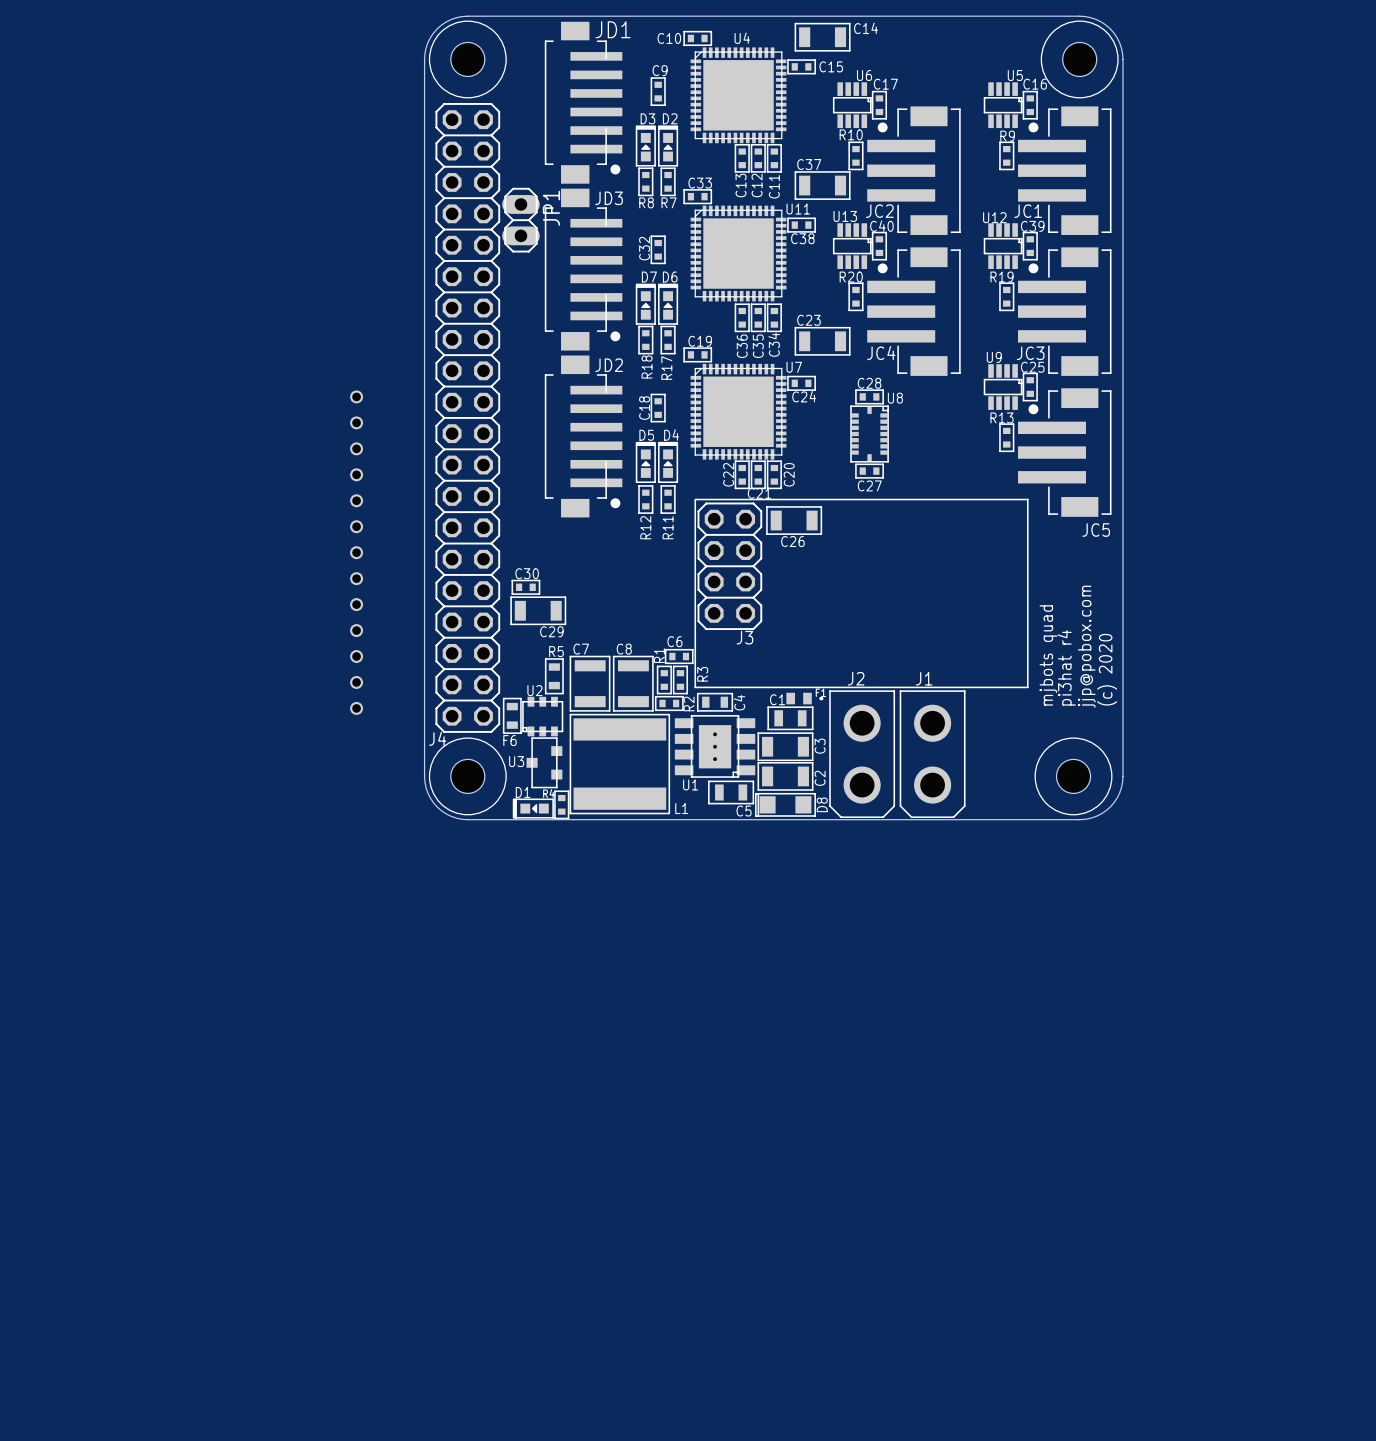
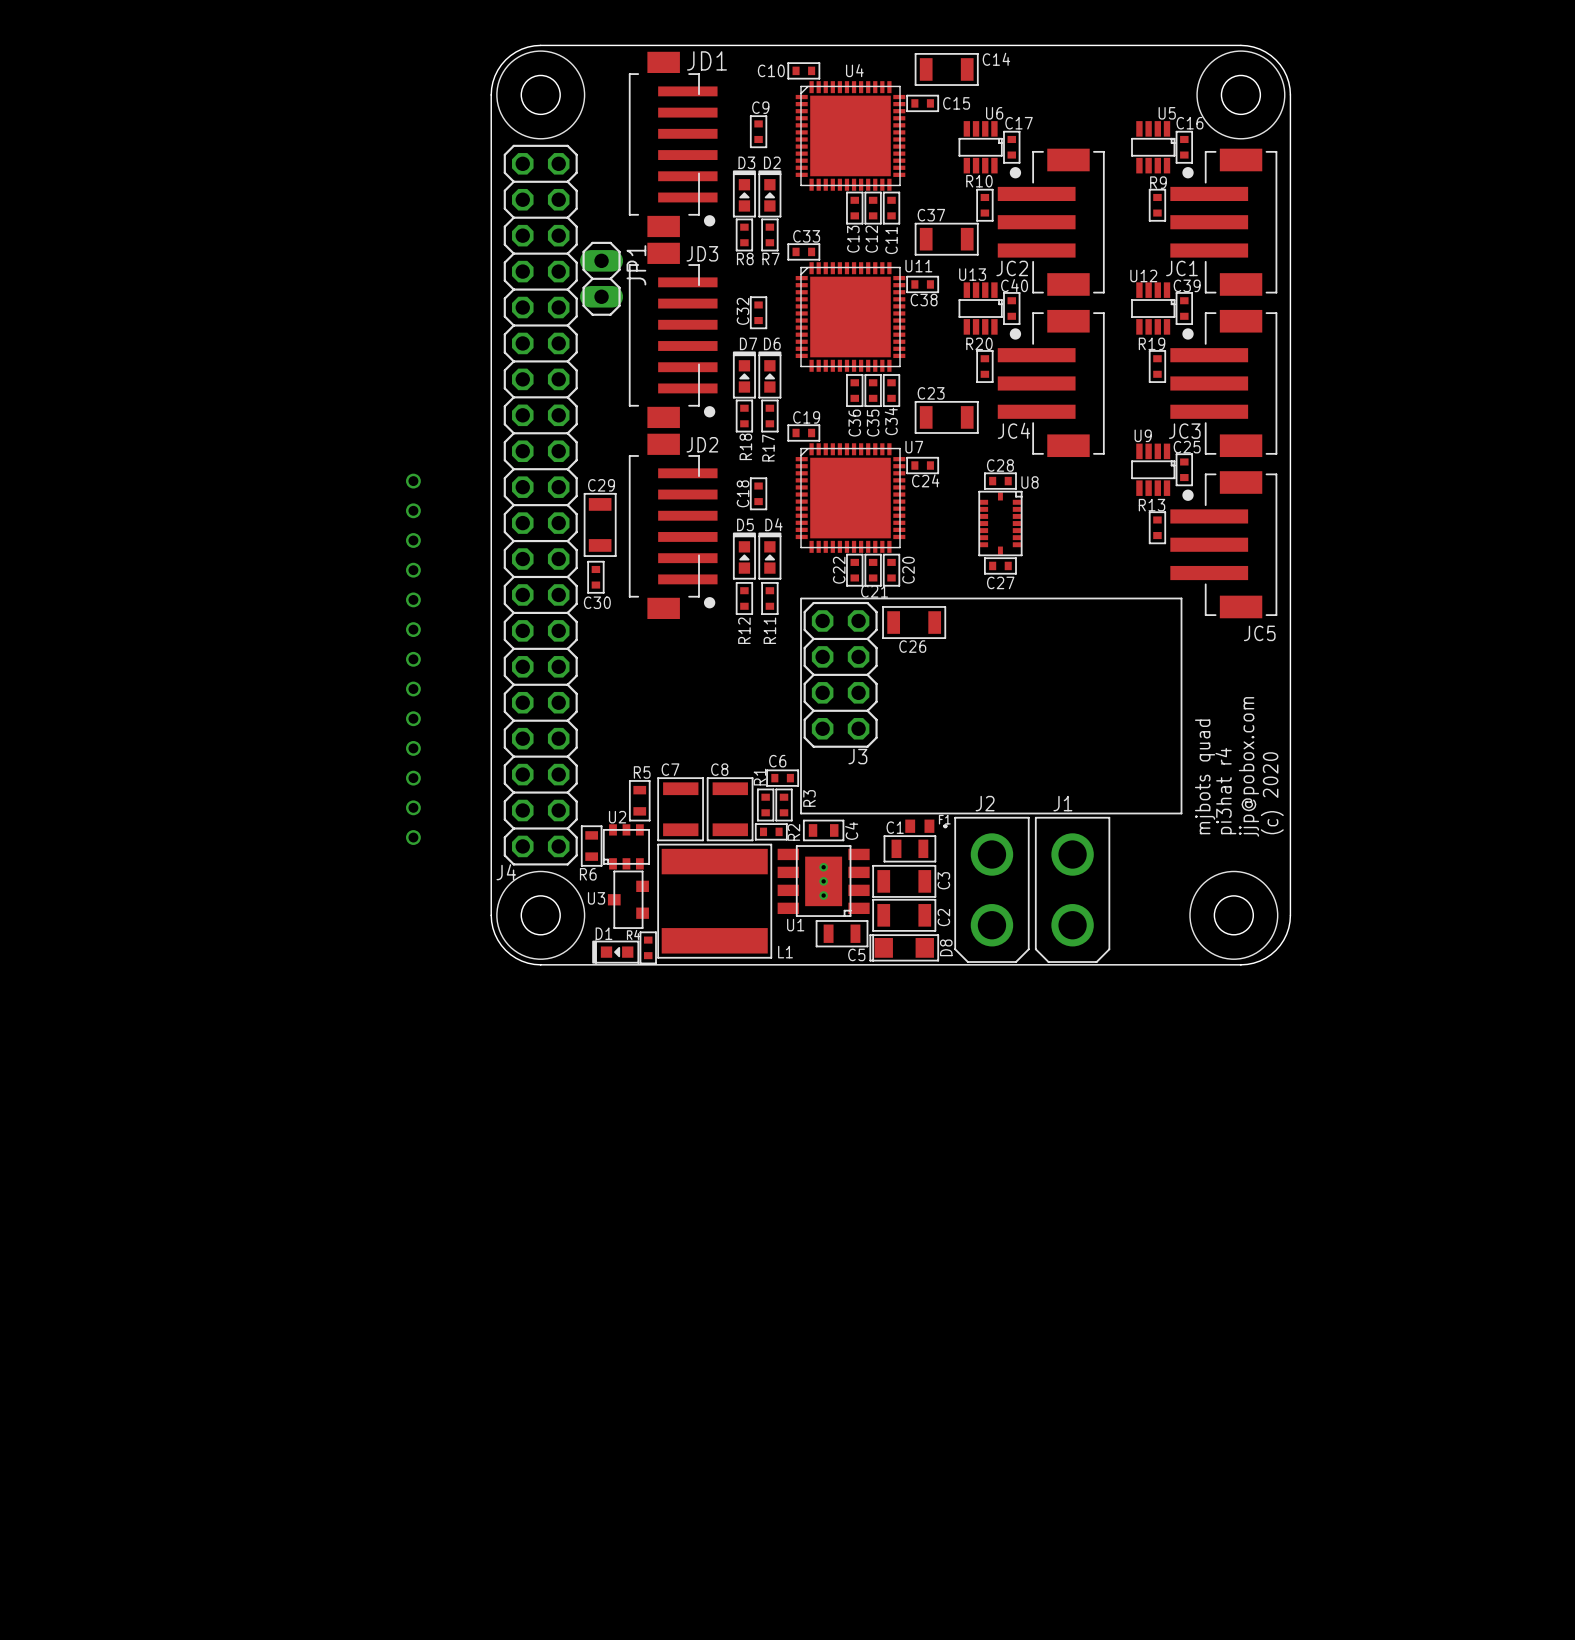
C30 rotation: 0° (525, 587) -> 90° clockwise (595, 577)
C30 position: (525, 587) -> (595, 577)
C29 rotation: 0° (538, 610) -> 90° clockwise (600, 524)
C29 position: (538, 610) -> (600, 524)
C29 name position: C29 (551, 631) -> C29 (601, 485)
F6 name: F6 (510, 740) -> R6 (588, 874)

